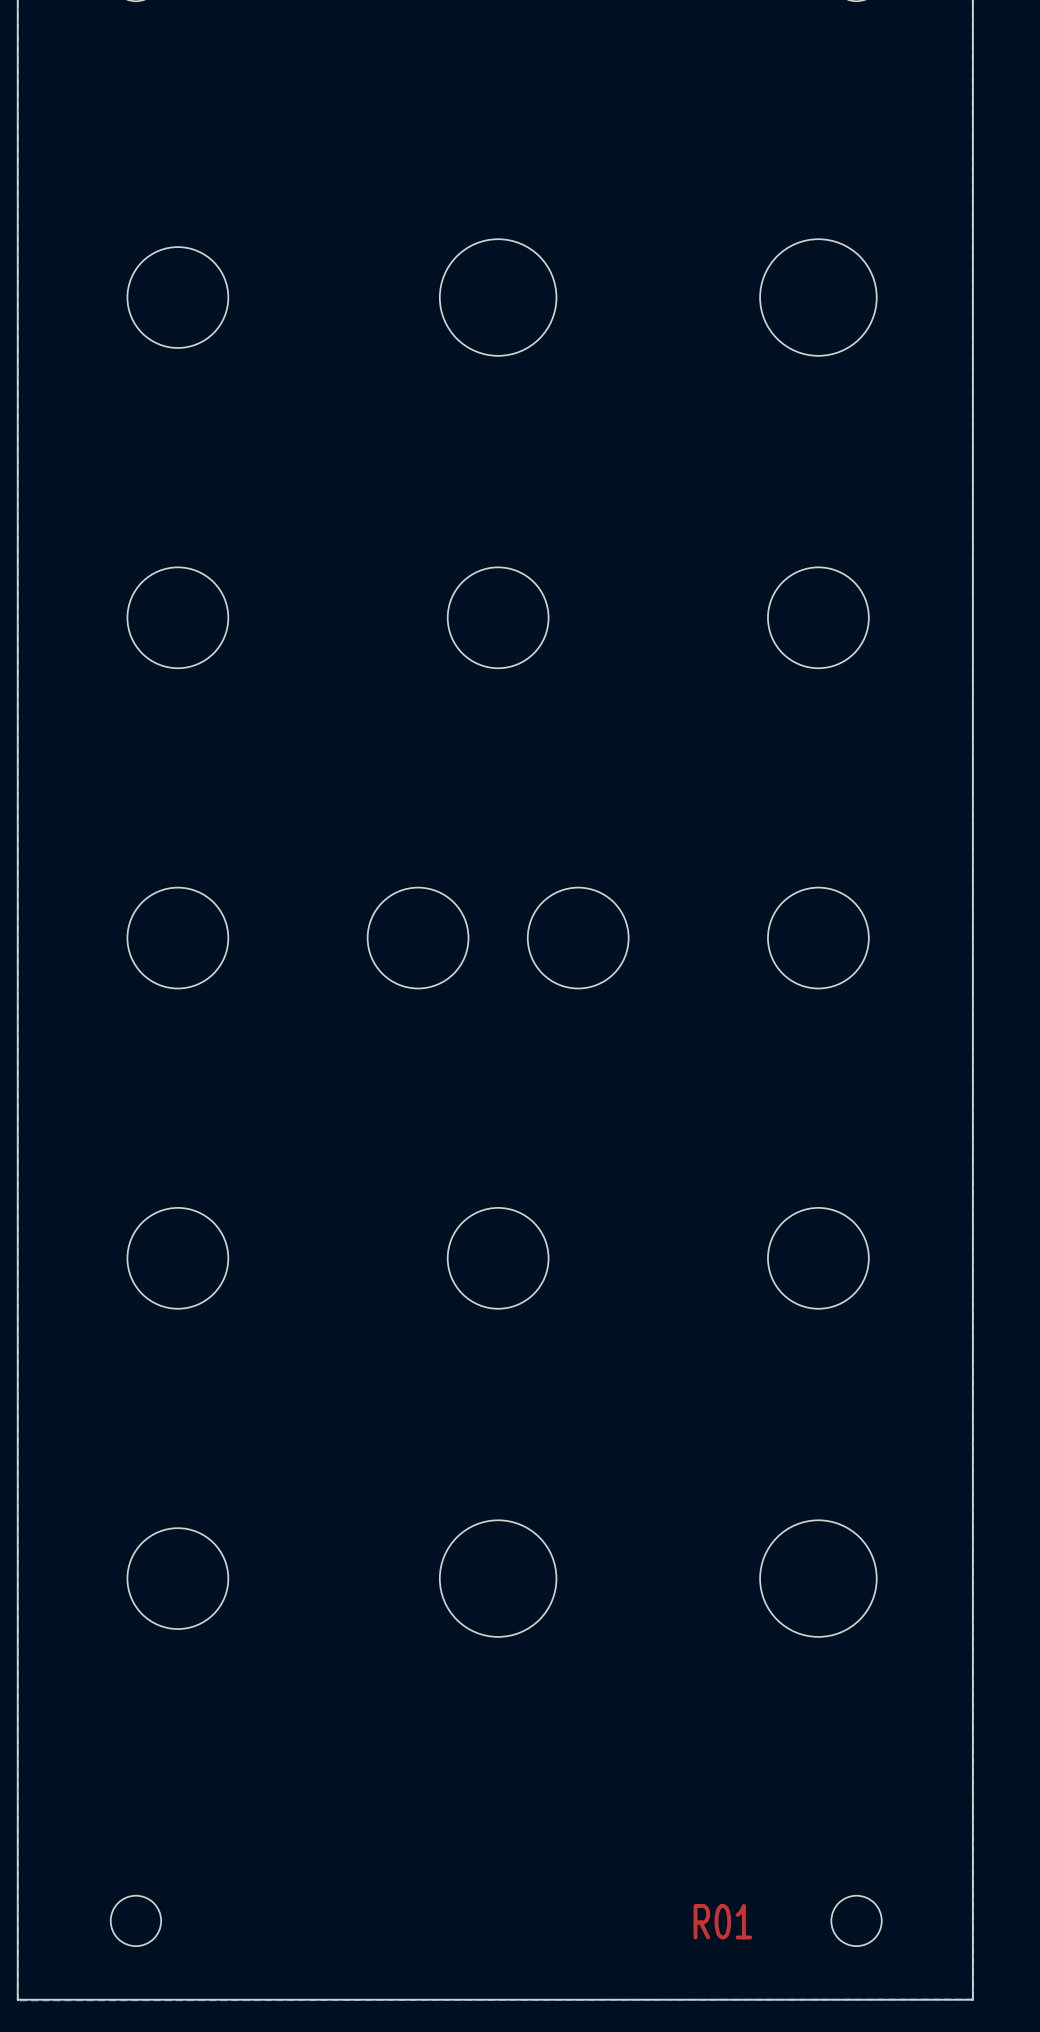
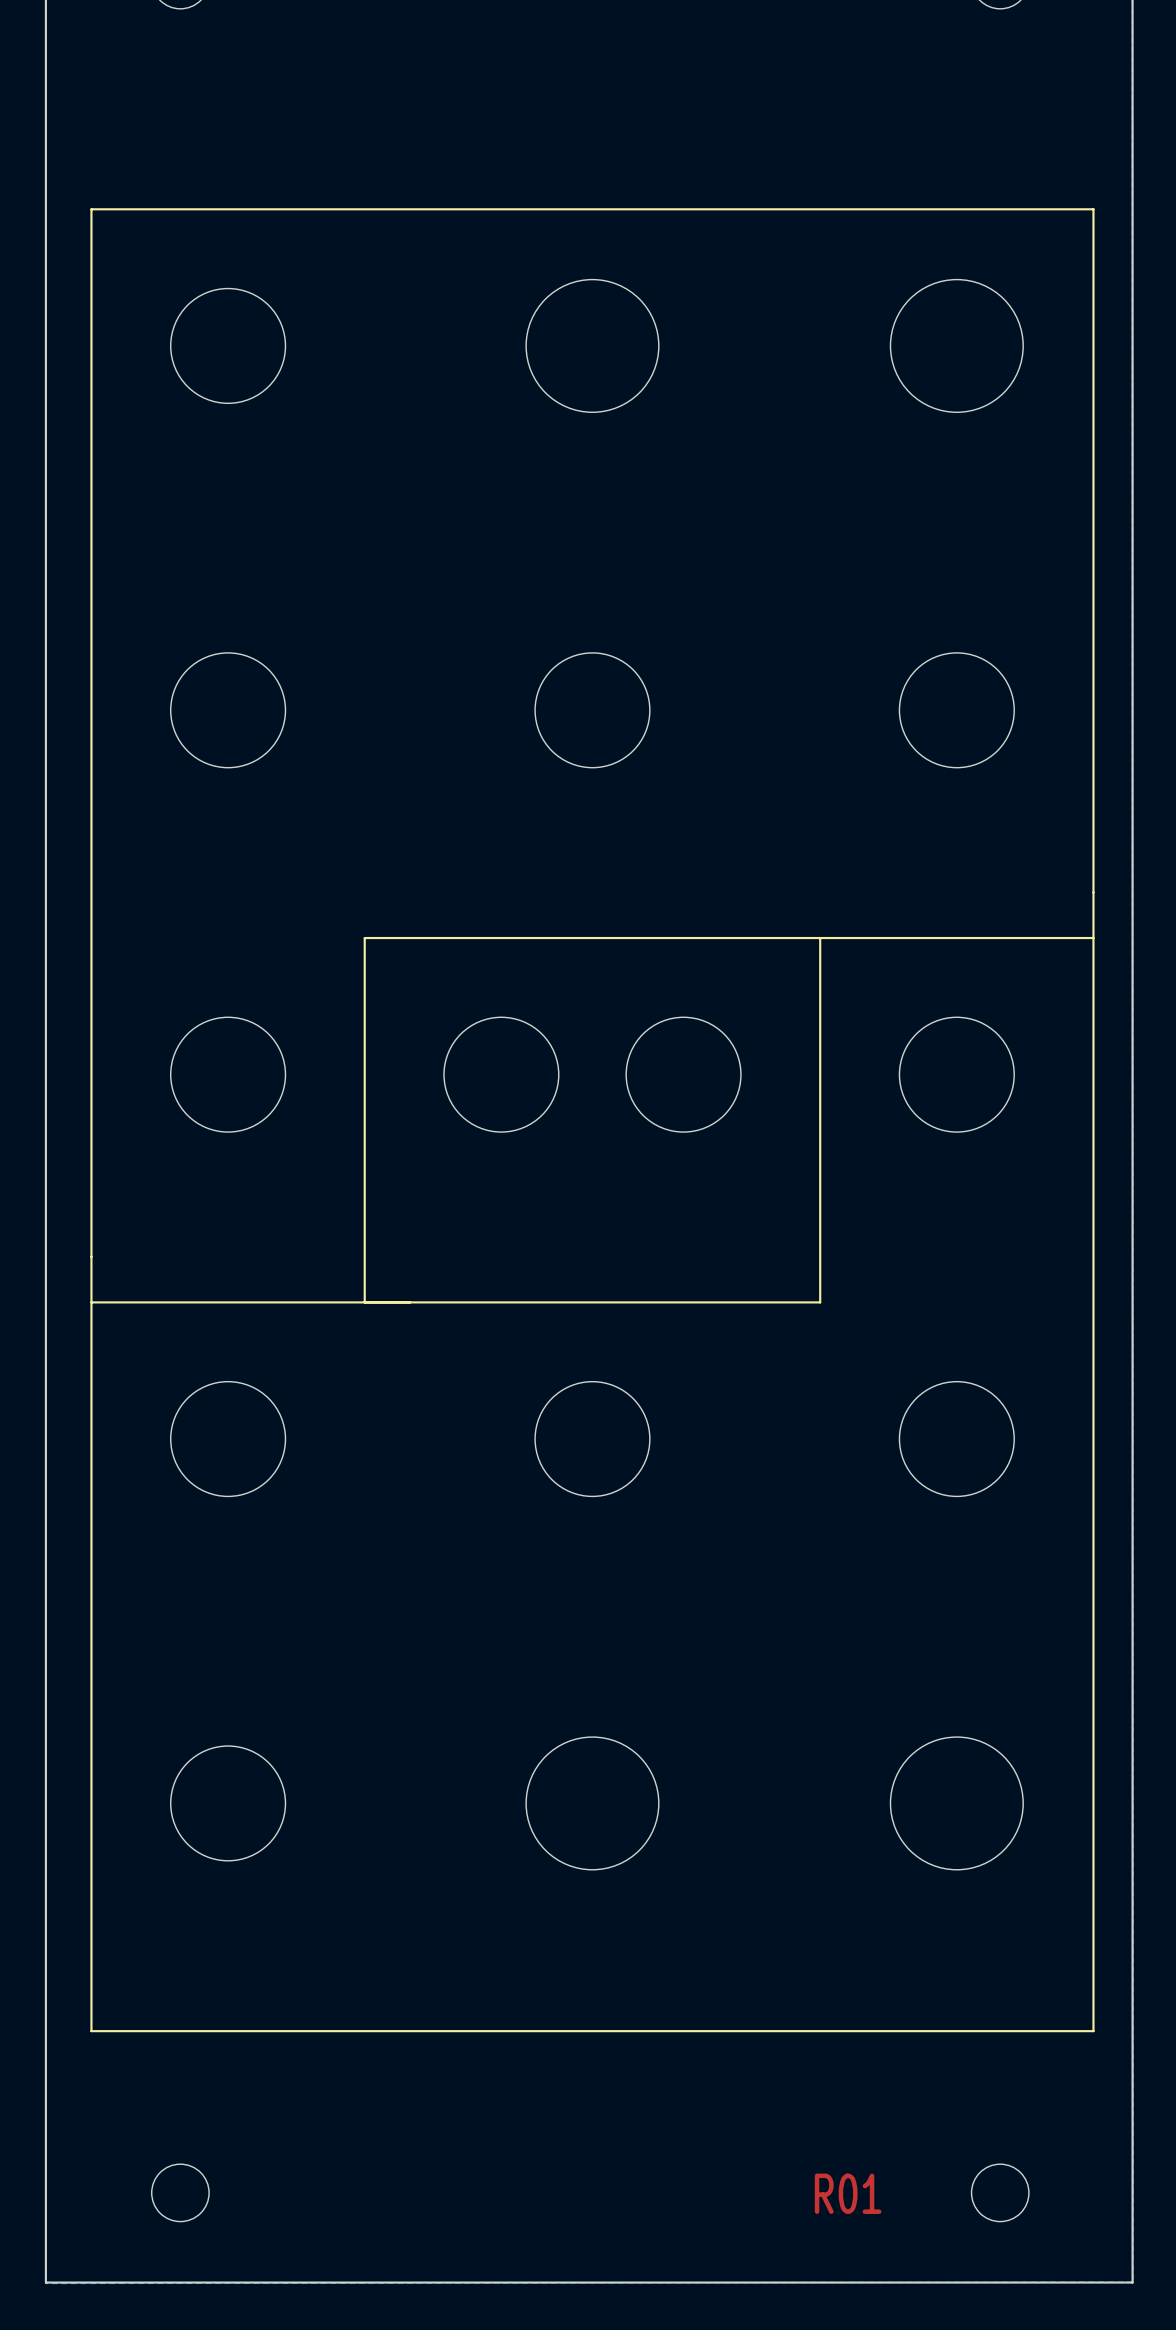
line: none -> (91, 209) (1093, 209) (1093, 2031) (91, 2031) (91, 209)
line: none -> (820, 938) (820, 1302) (91, 1302)
line: none -> (1093, 938) (364, 938) (364, 1302)

